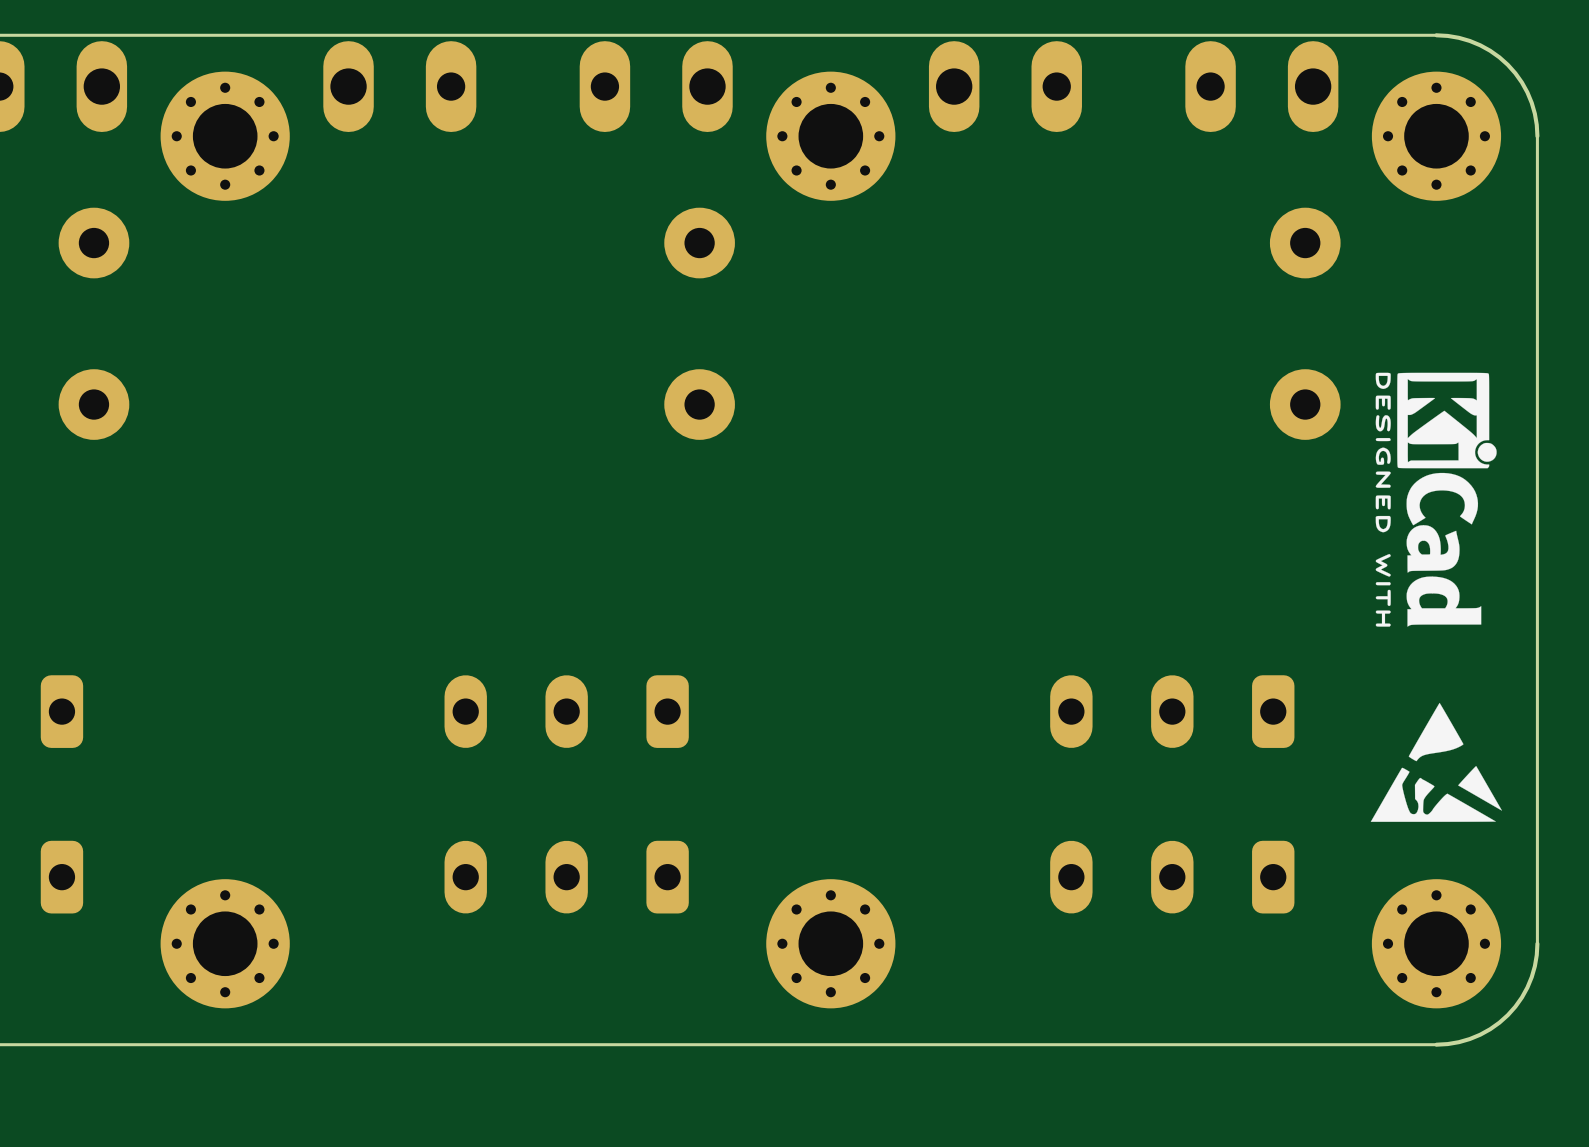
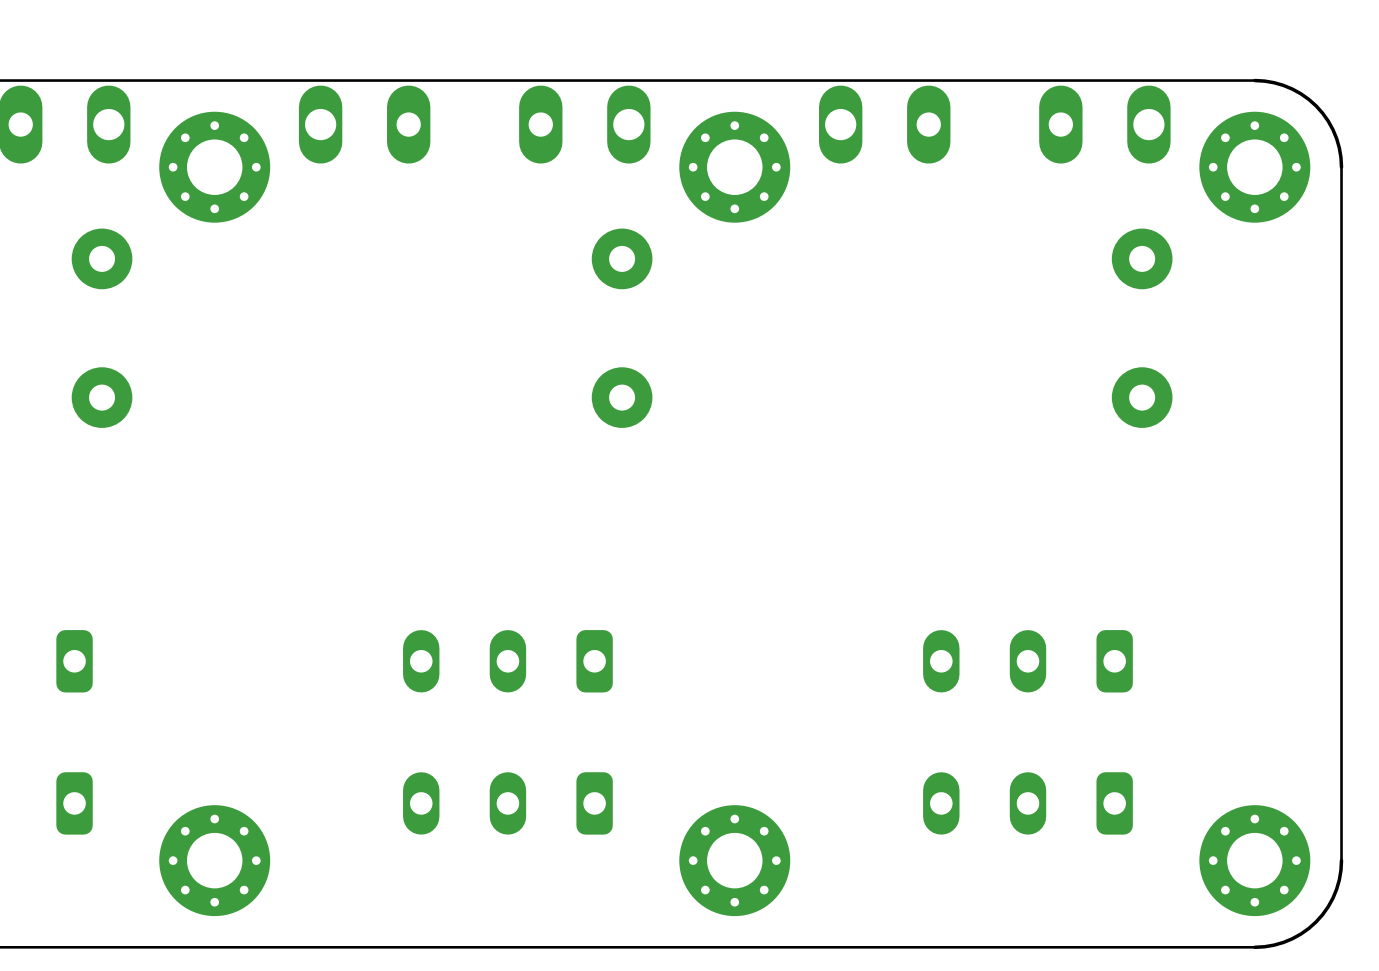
drawing: [1375, 372, 1497, 627] -> none
drawing: [1370, 702, 1502, 822] -> none

